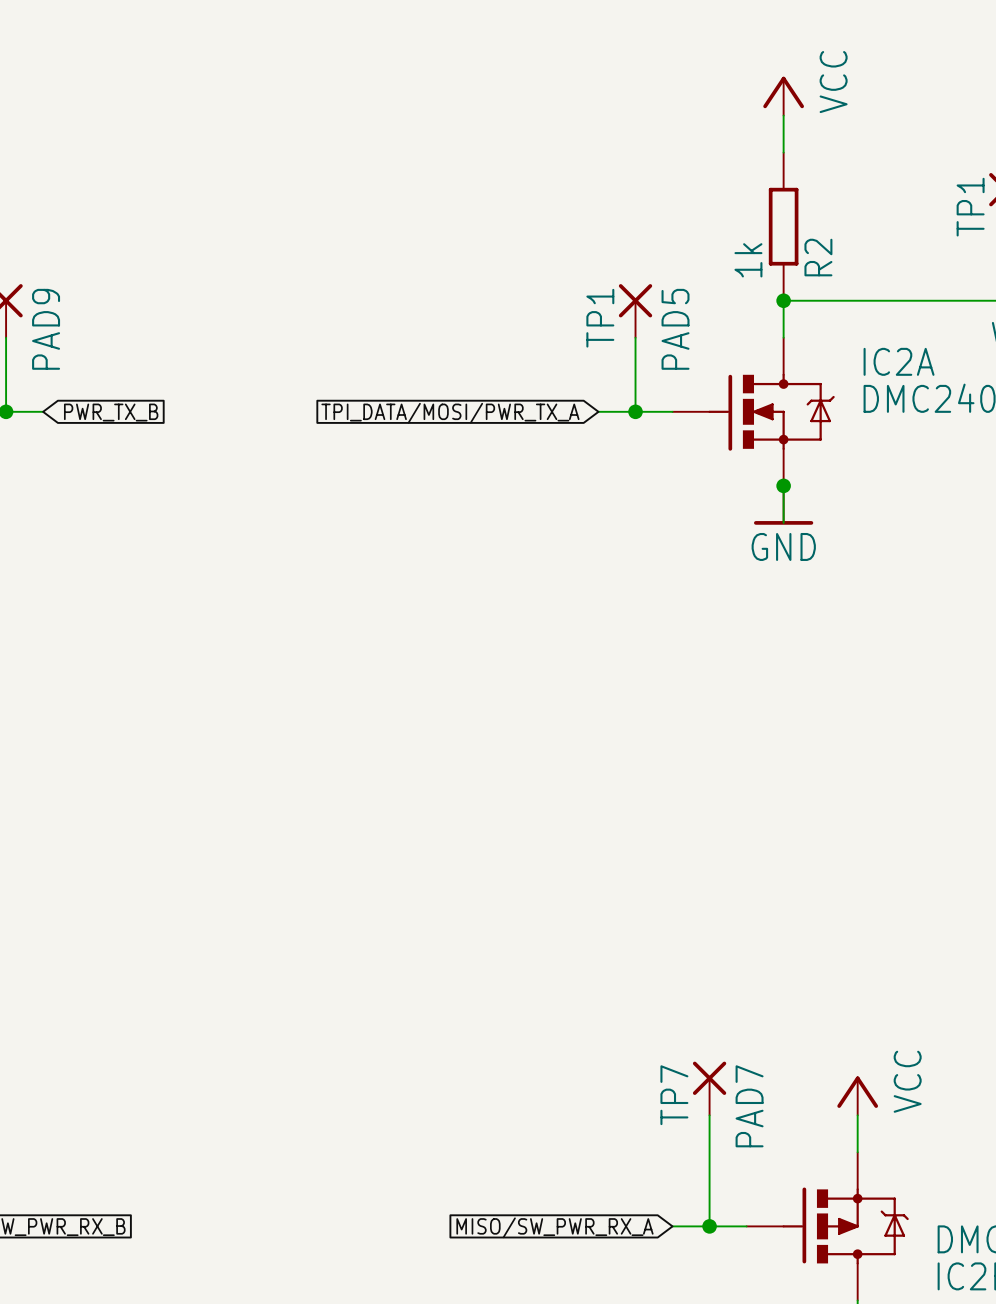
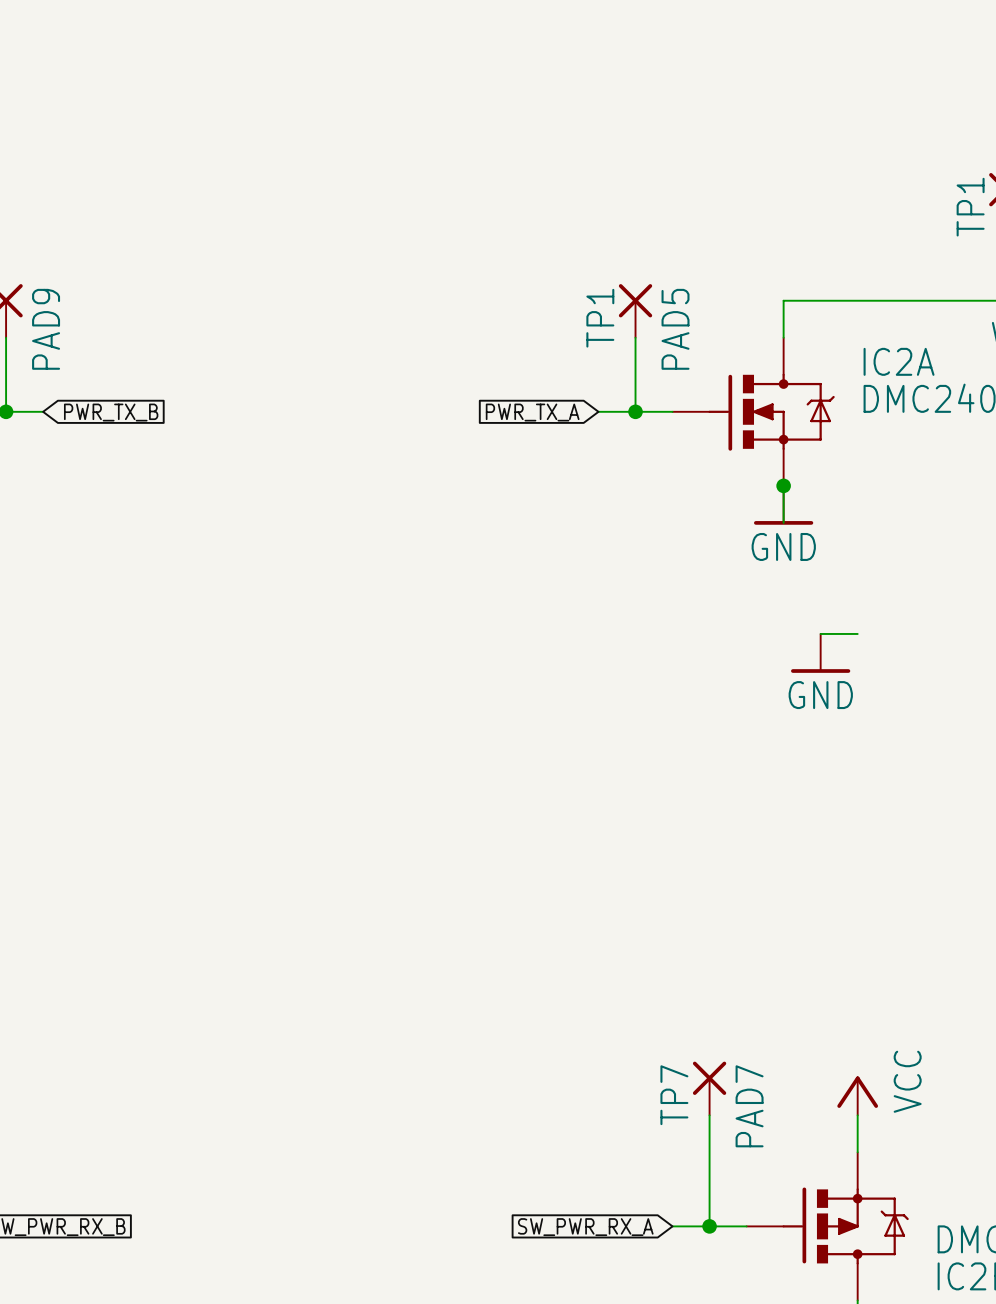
power symbol: VCC (783, 96) -> none
wire: (783, 115) (783, 152) -> none
R2: 1k (783, 226) -> none
junction: (783, 300) -> none
global label: TPI_DATA/MOSI/PWR_TX_A (450, 413) -> PWR_TX_A (532, 412)
wire: none -> (820, 633) (857, 633)
power symbol: none -> GND (820, 653)
global label: MISO/SW_PWR_RX_A (554, 1227) -> SW_PWR_RX_A (585, 1227)

